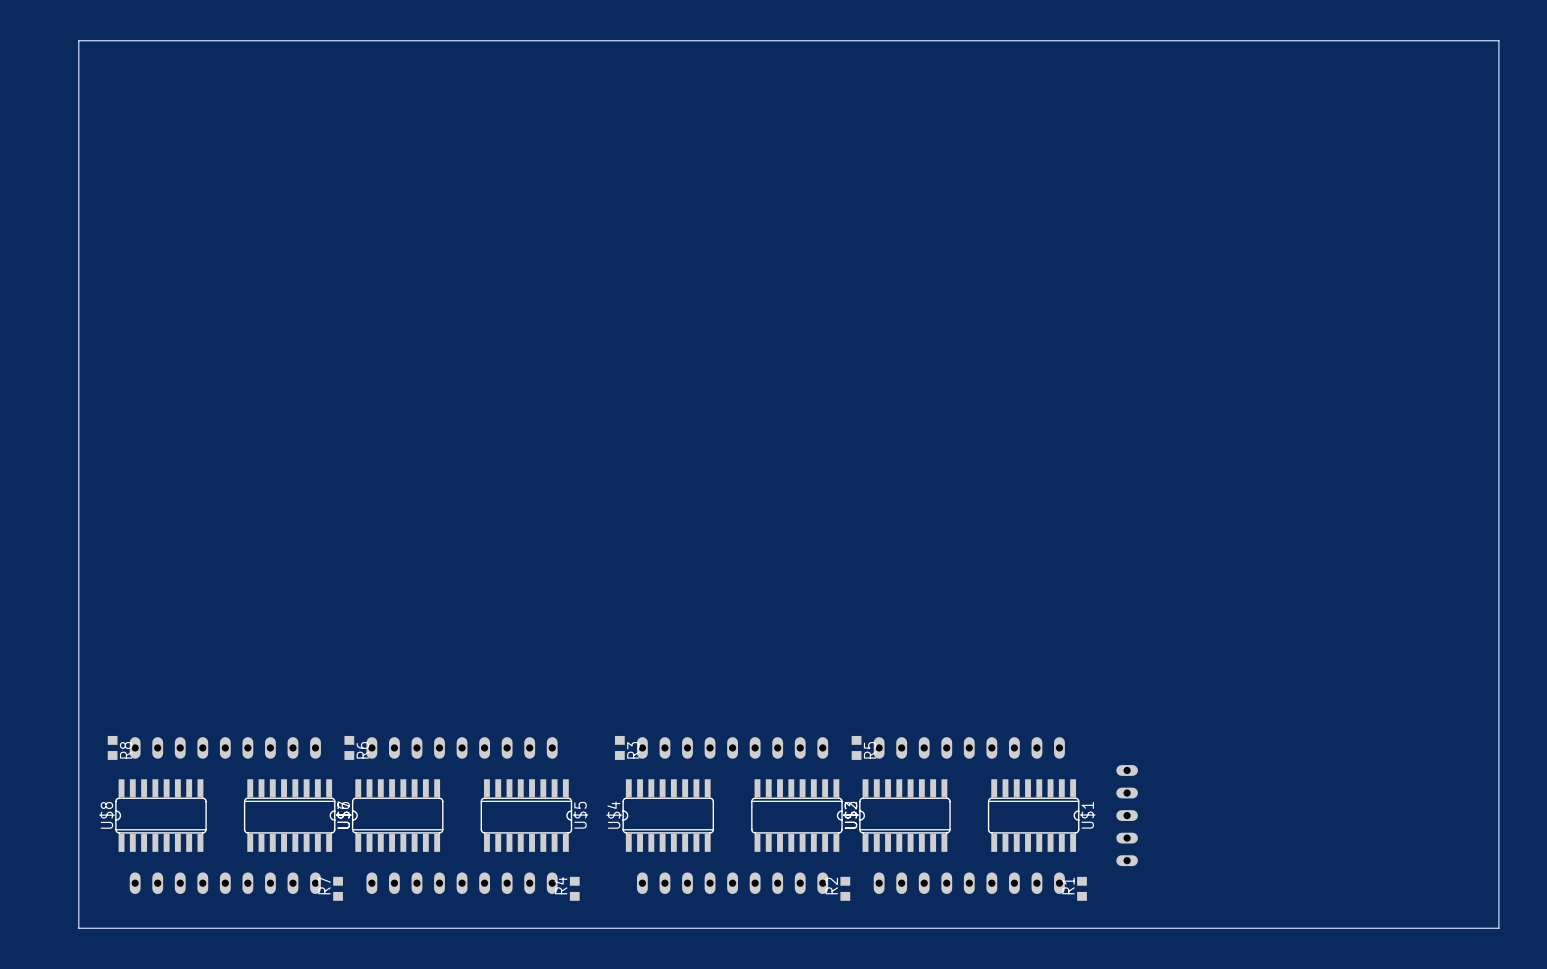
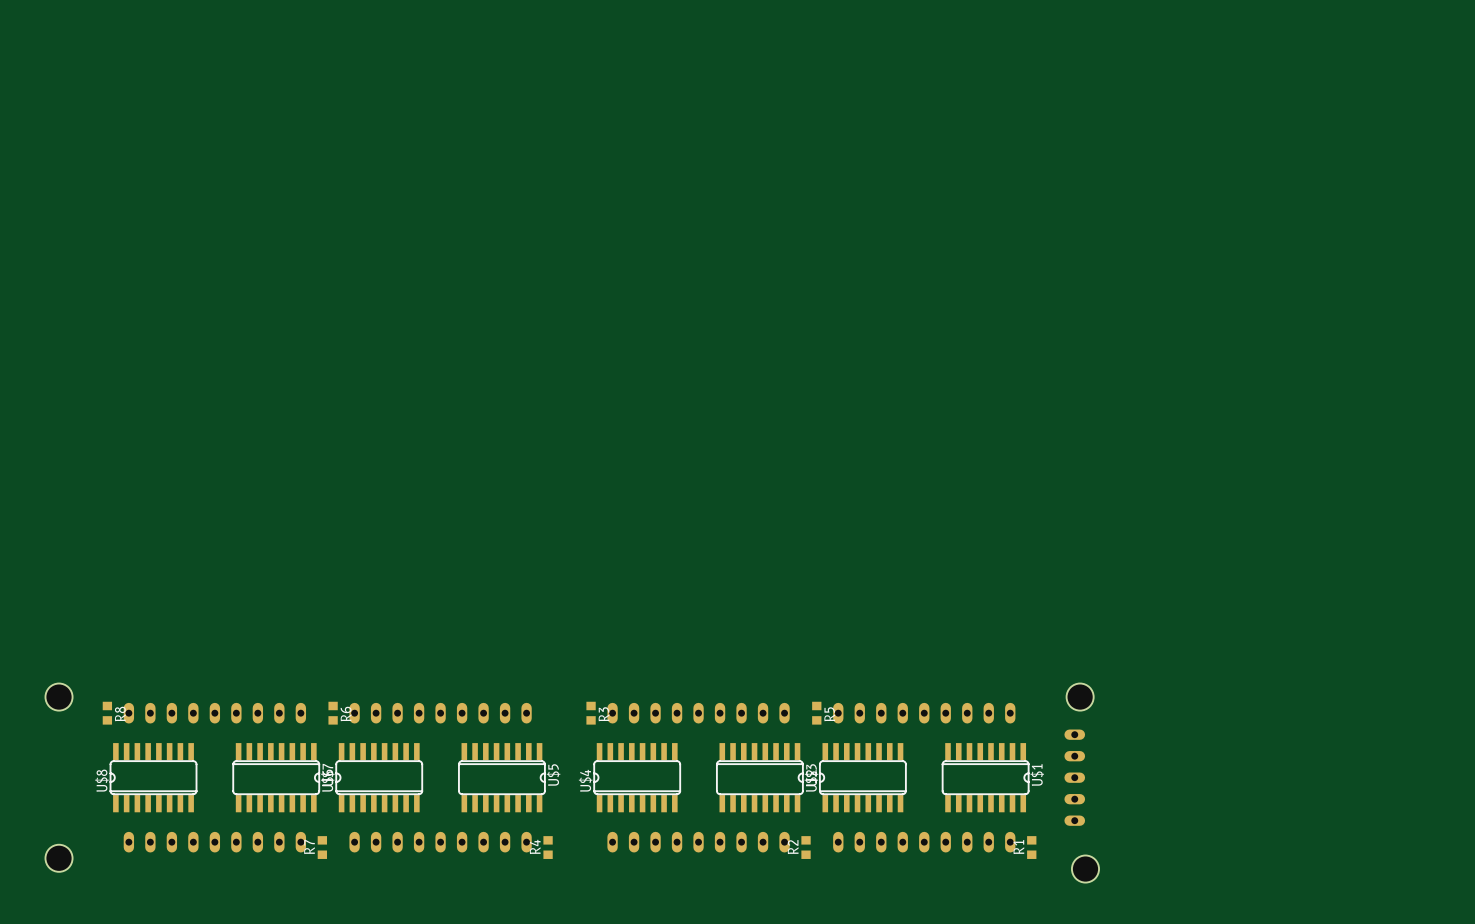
board edge: (78, 40) (1498, 40) (1498, 928) (78, 928) (78, 40) -> none
hole: none -> (59, 697)
hole: none -> (1080, 697)
hole: none -> (59, 858)
hole: none -> (1085, 869)

